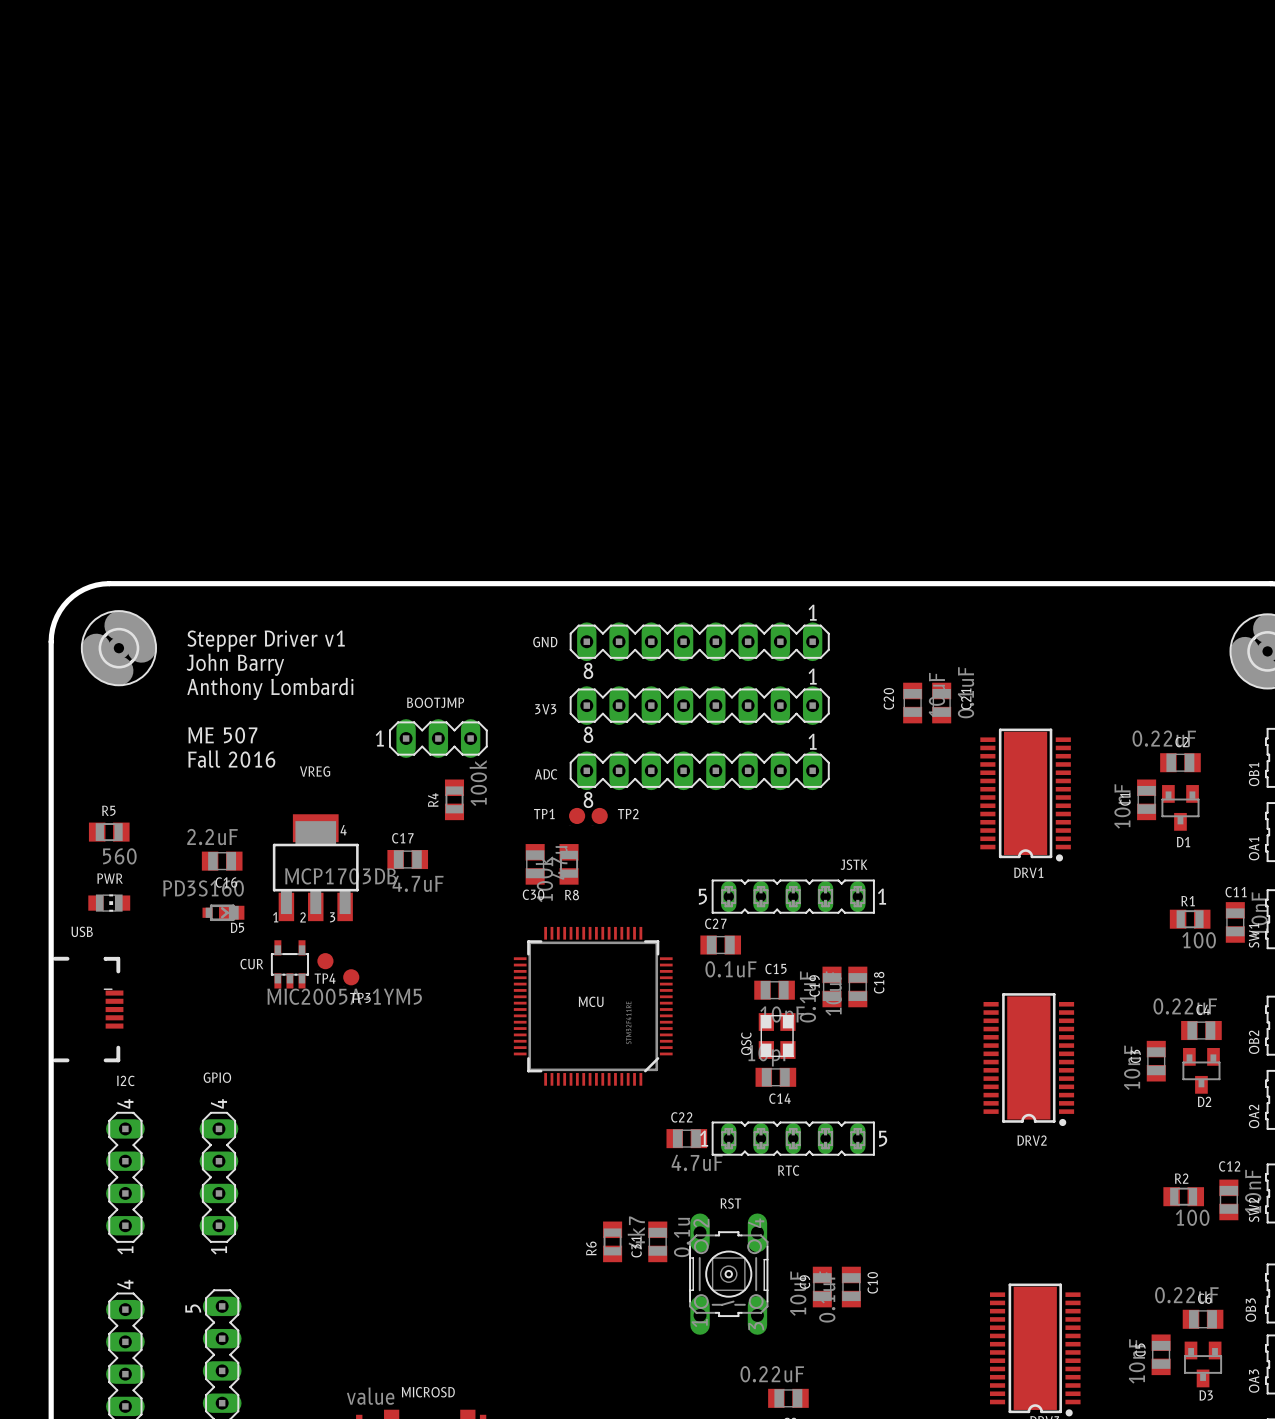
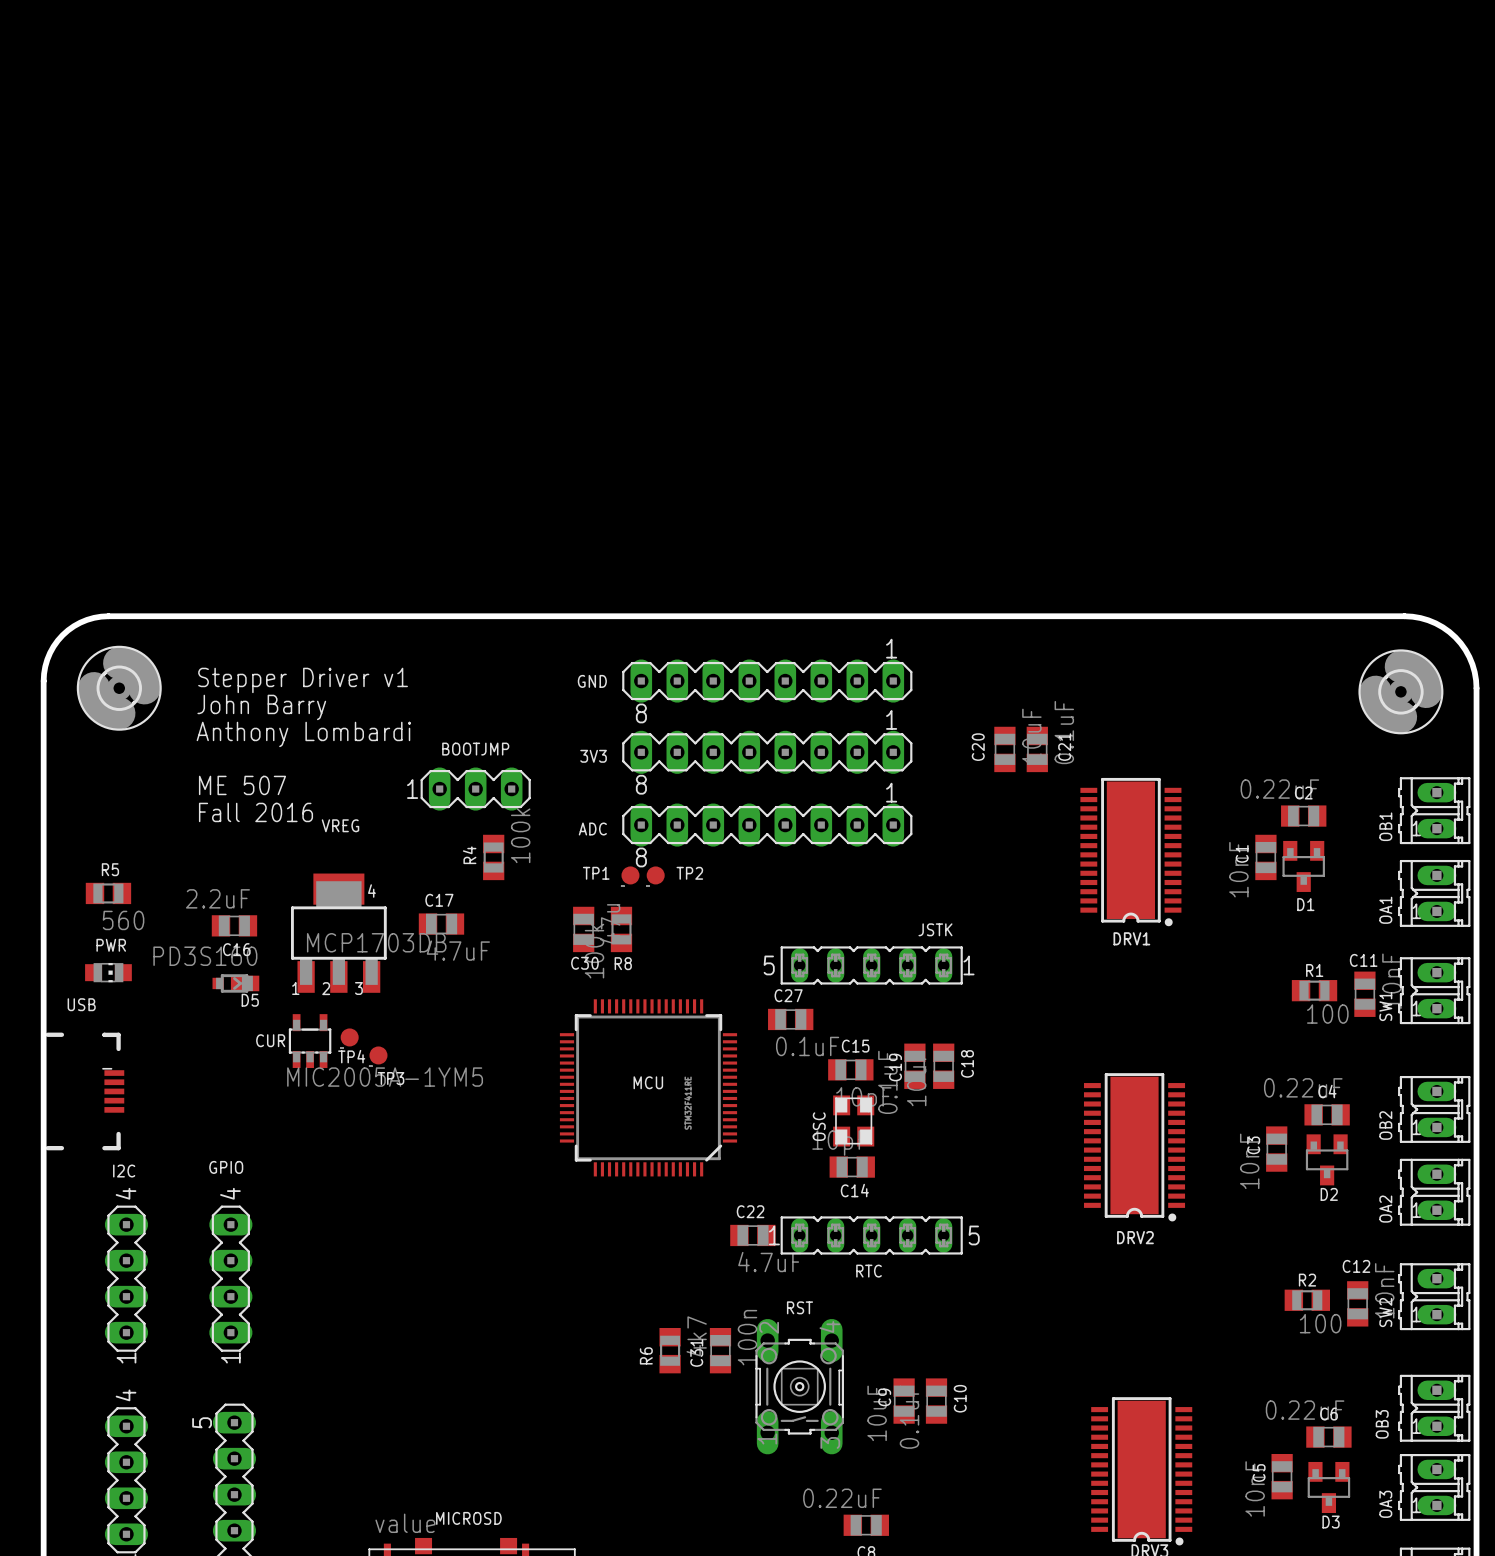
C31 value: 0.1u (682, 1237) -> 100n (747, 1337)

